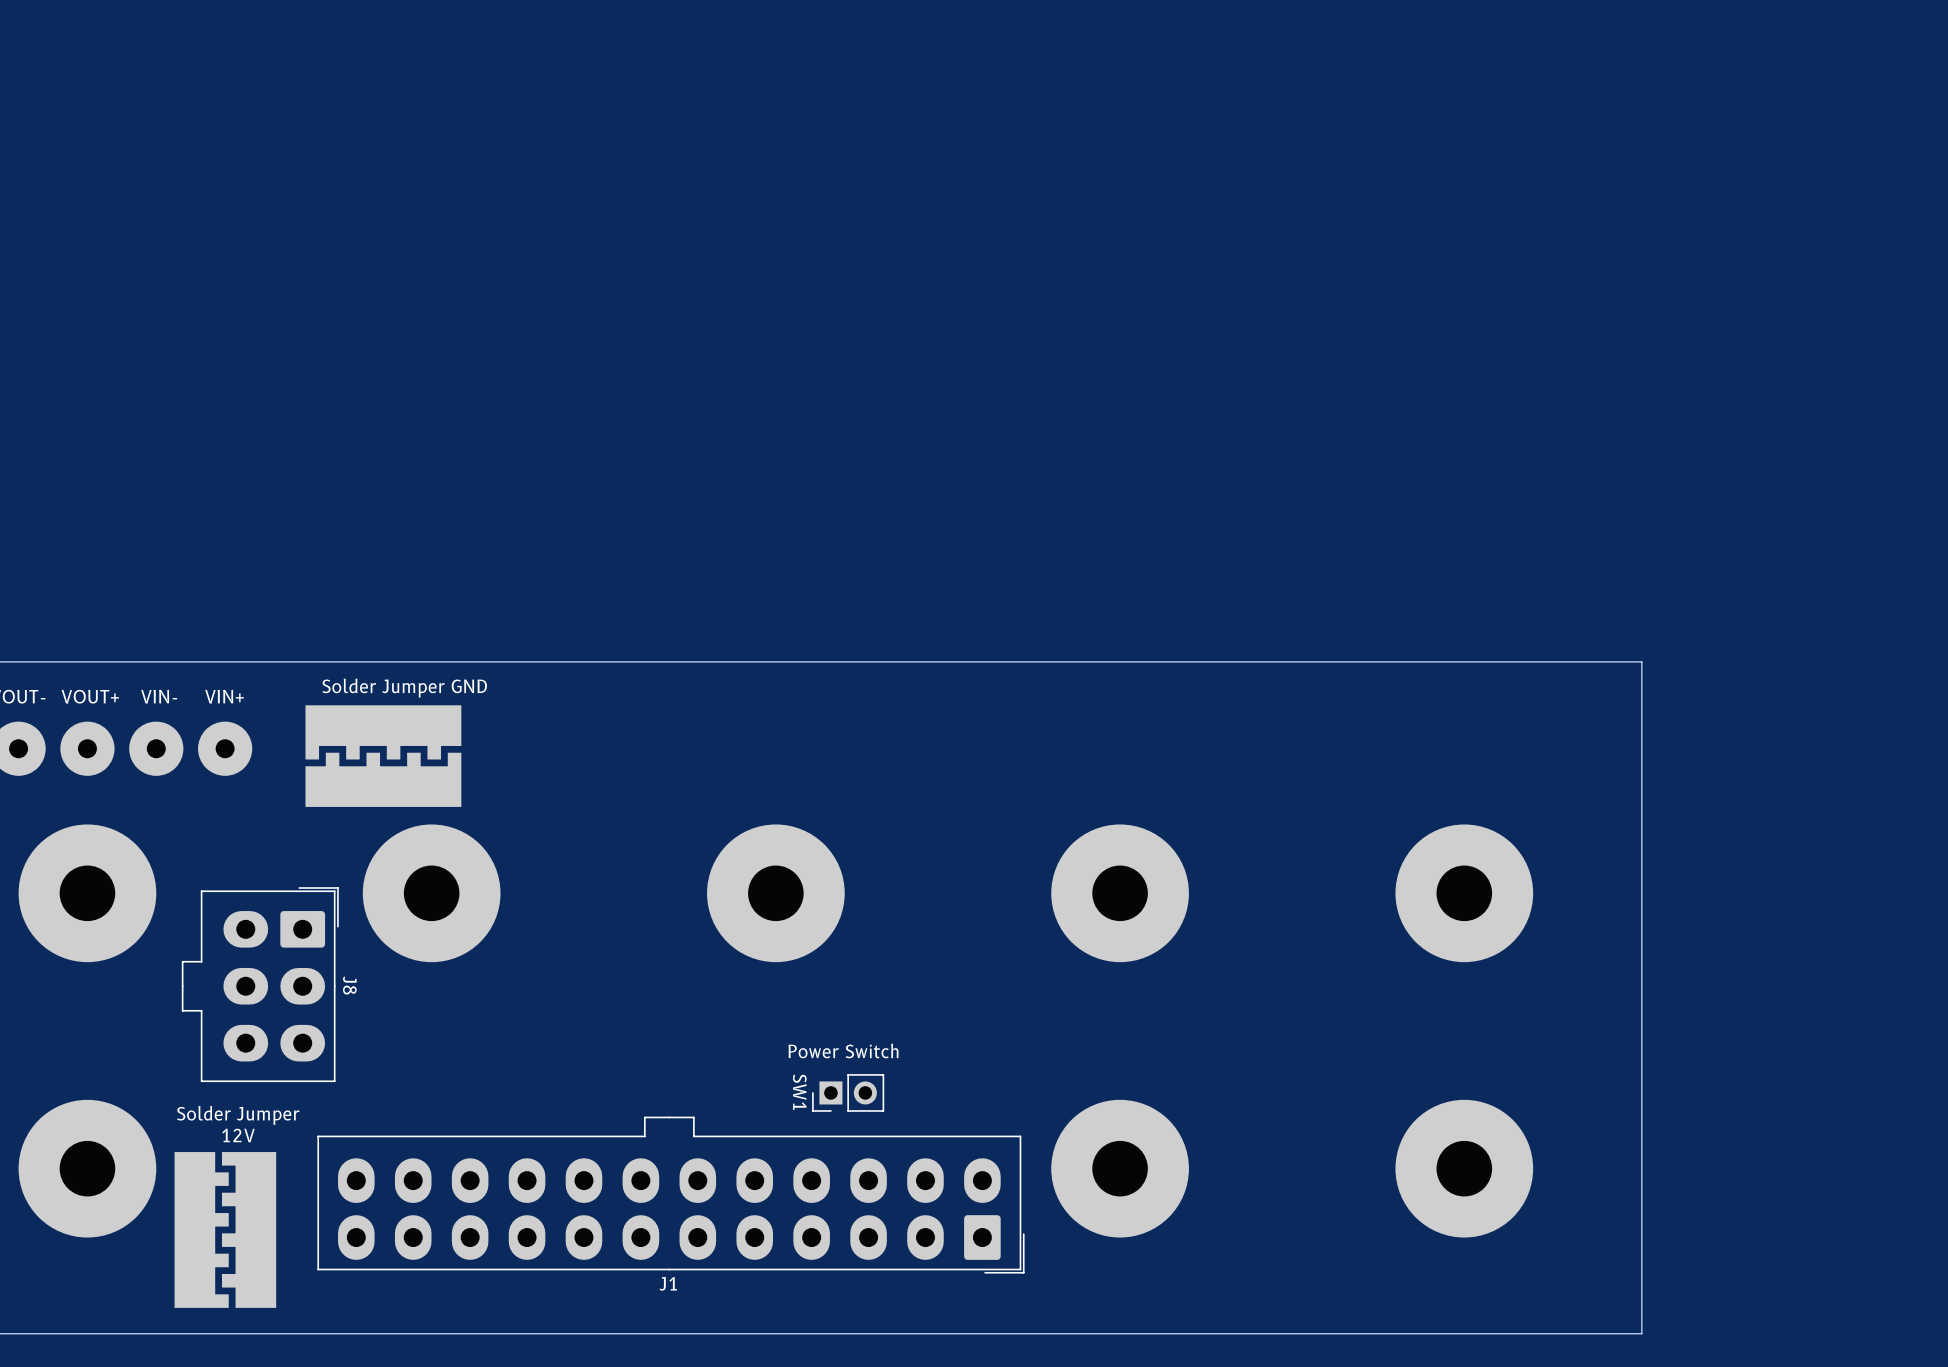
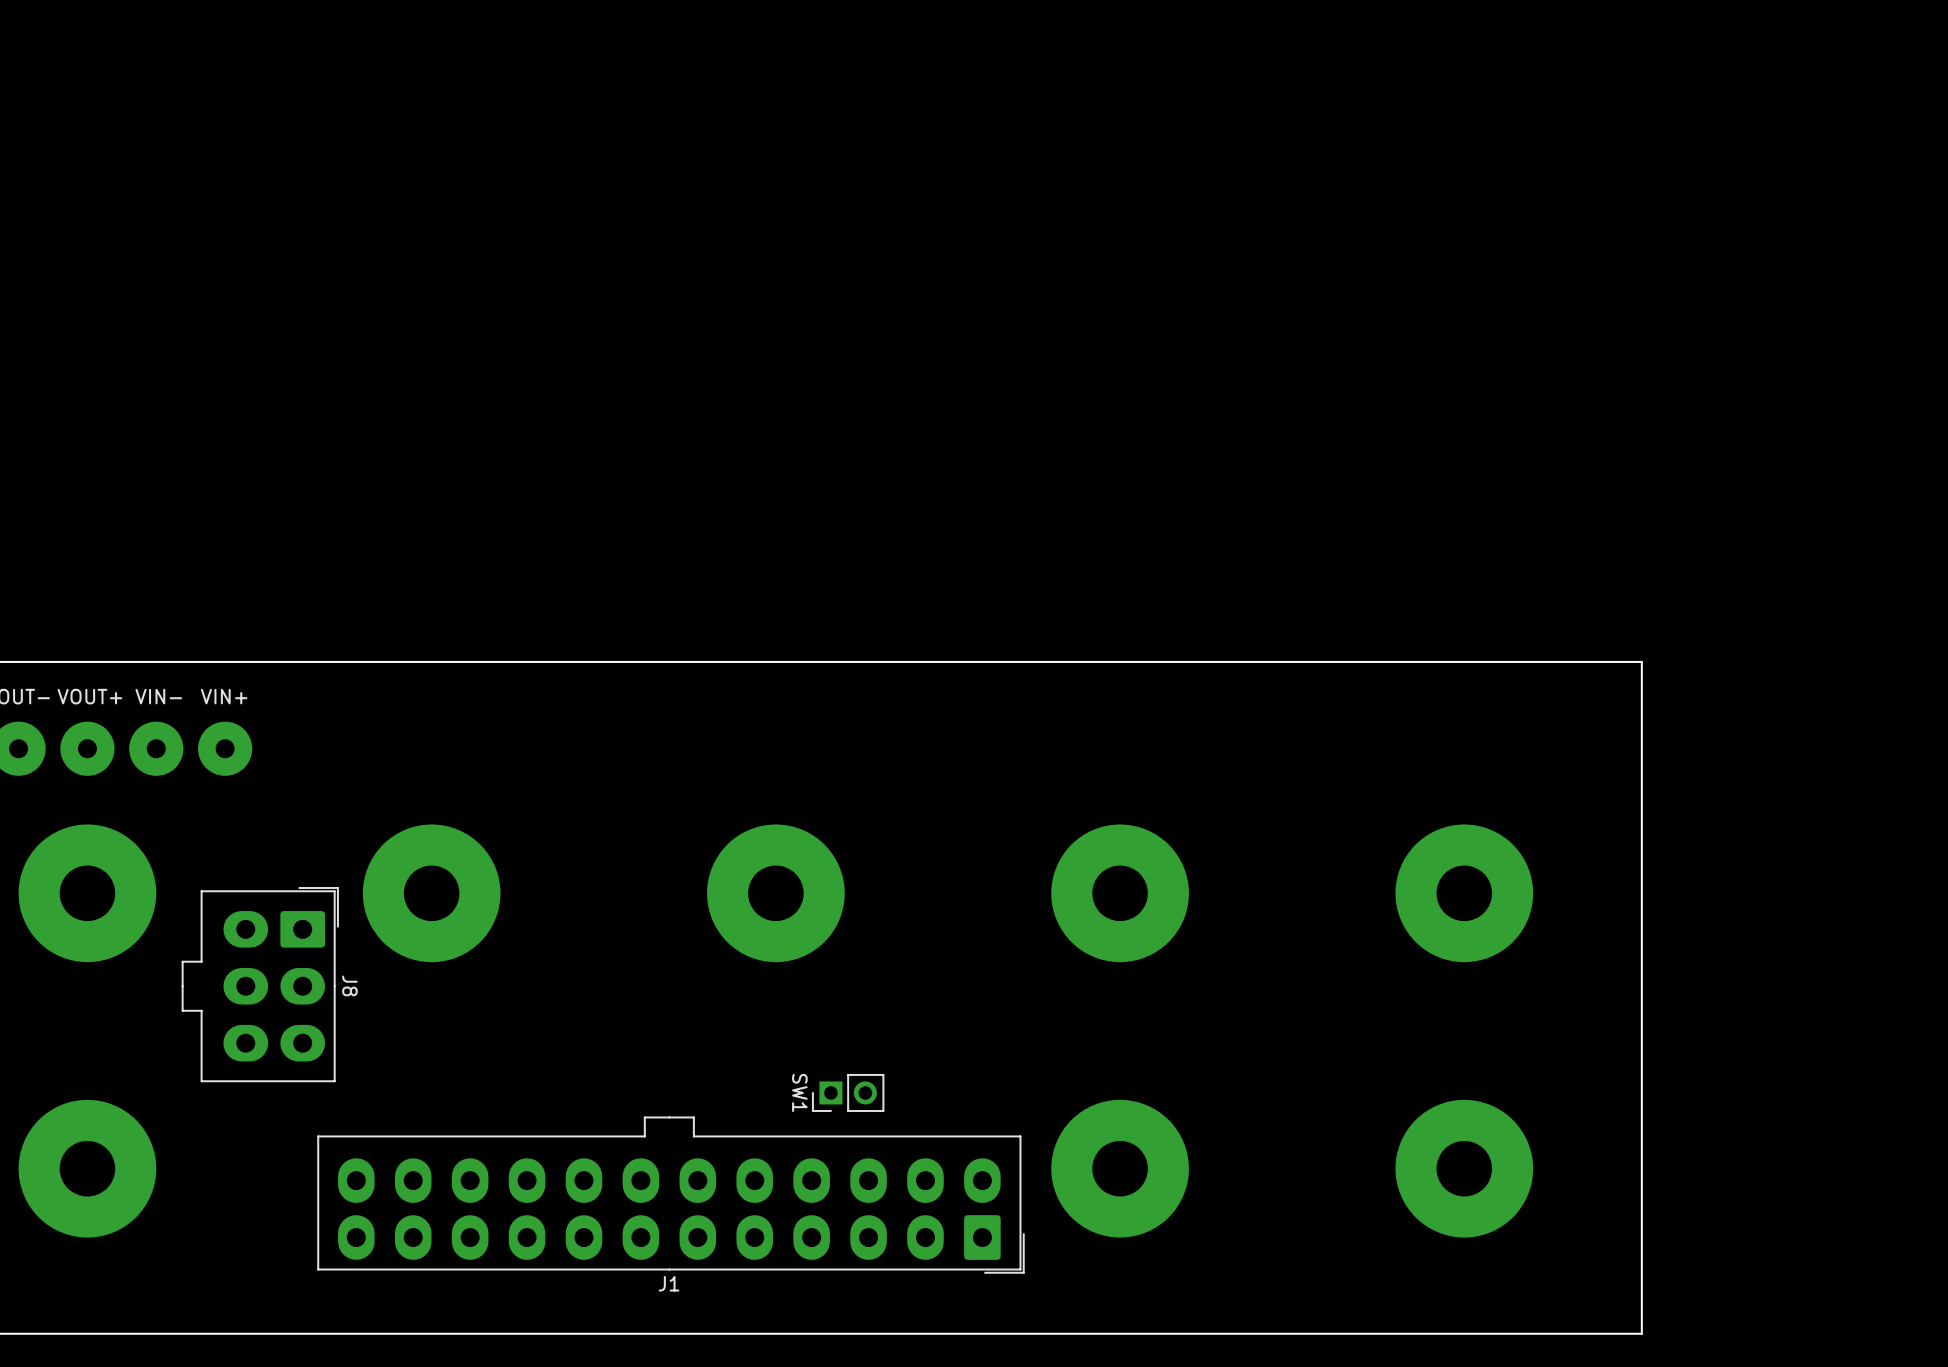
text: Solder Jumper GND (404, 688) -> none
part: (383, 756) -> none
text: Power Switch (843, 1050) -> none
text: Solder Jumper (238, 1115) -> none
text: 12V (238, 1135) -> none
part: (225, 1229) -> none

